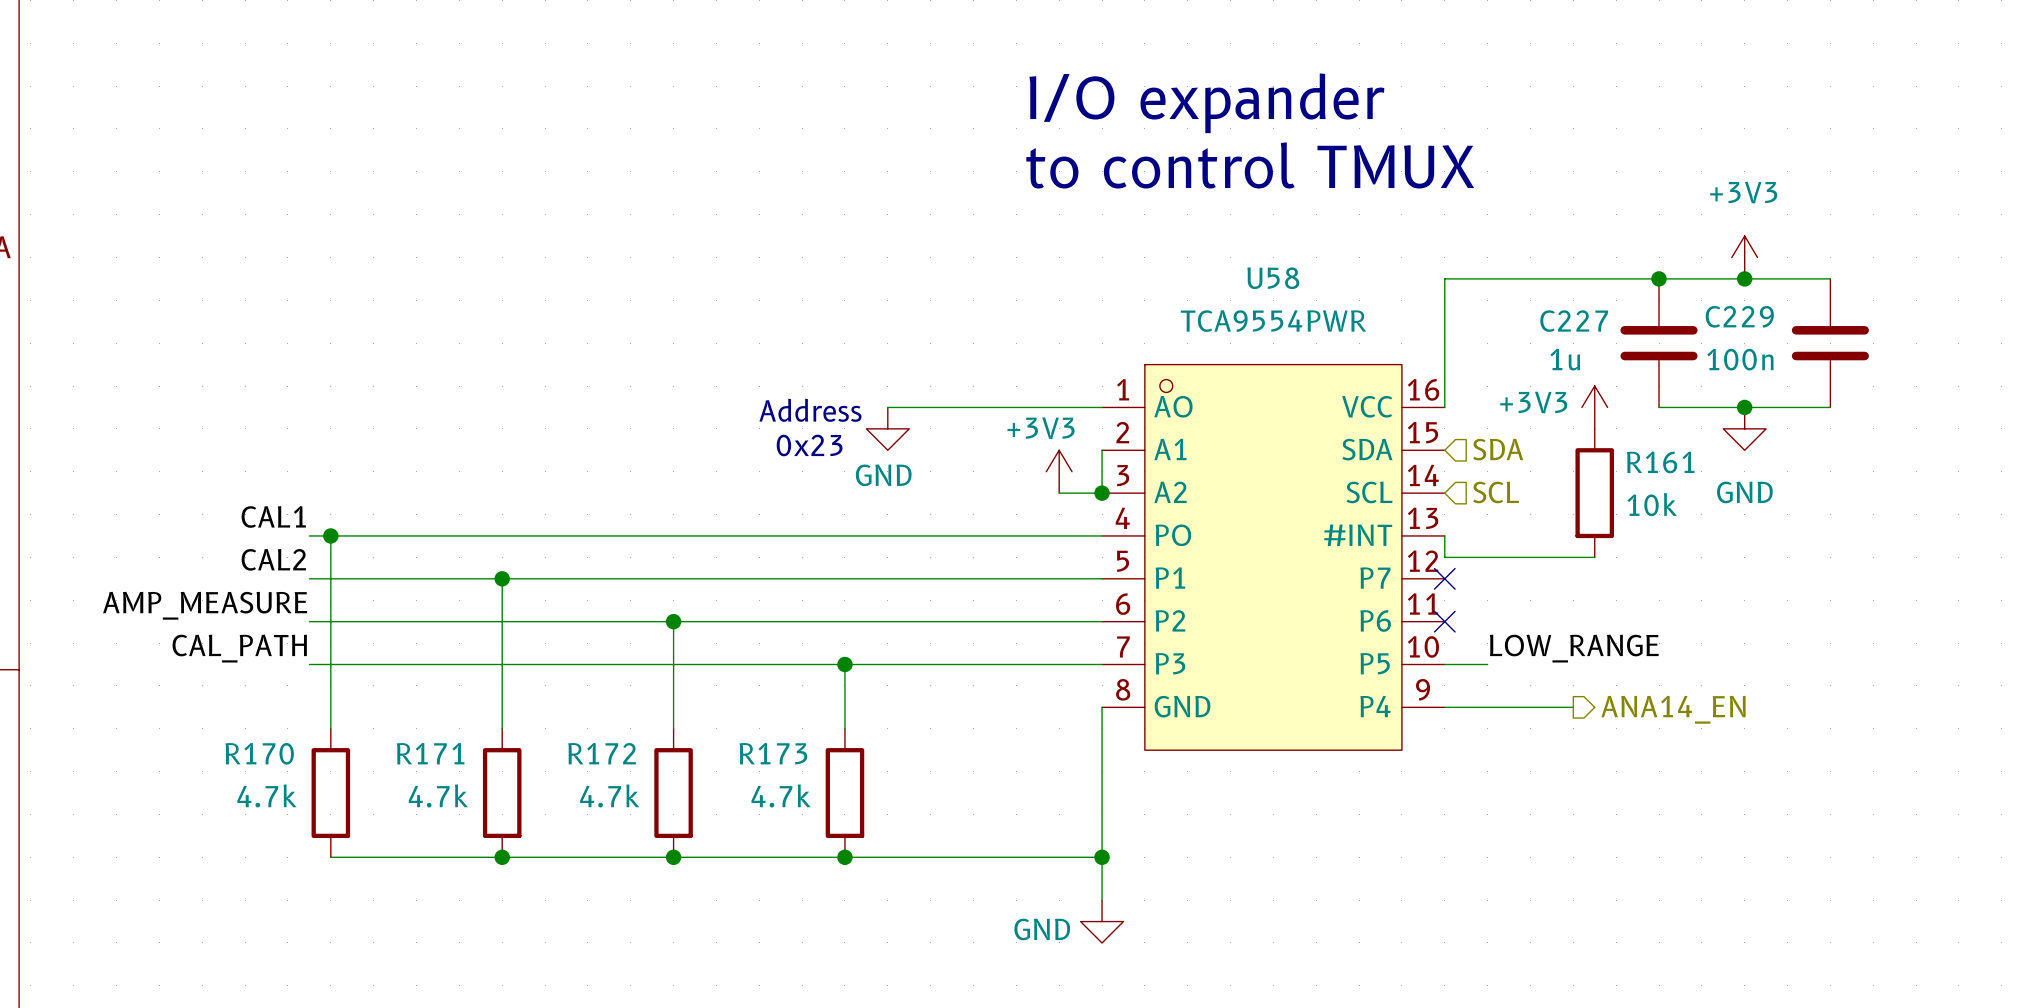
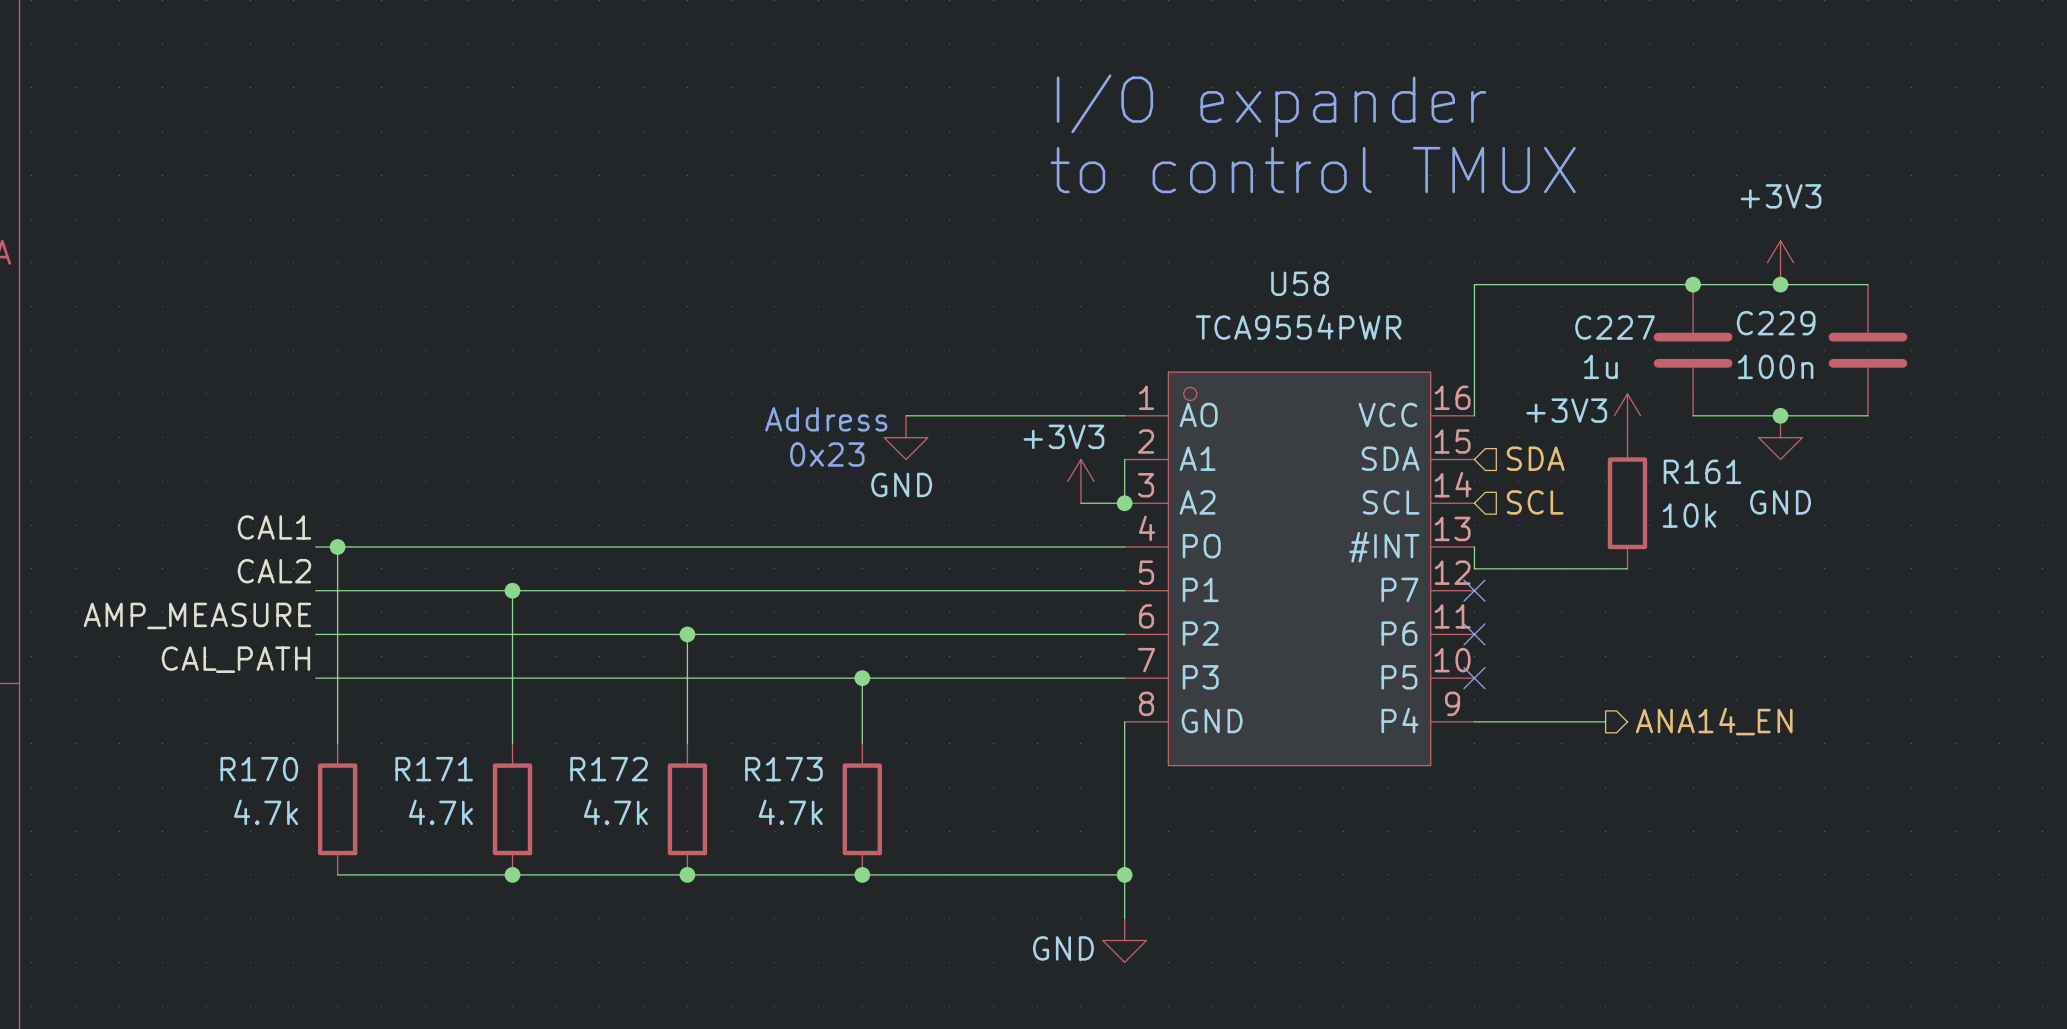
label: LOW_RANGE (1574, 648) -> none
wire: (1444, 664) (1487, 664) -> none
no-connect mark: none -> (1474, 678)

